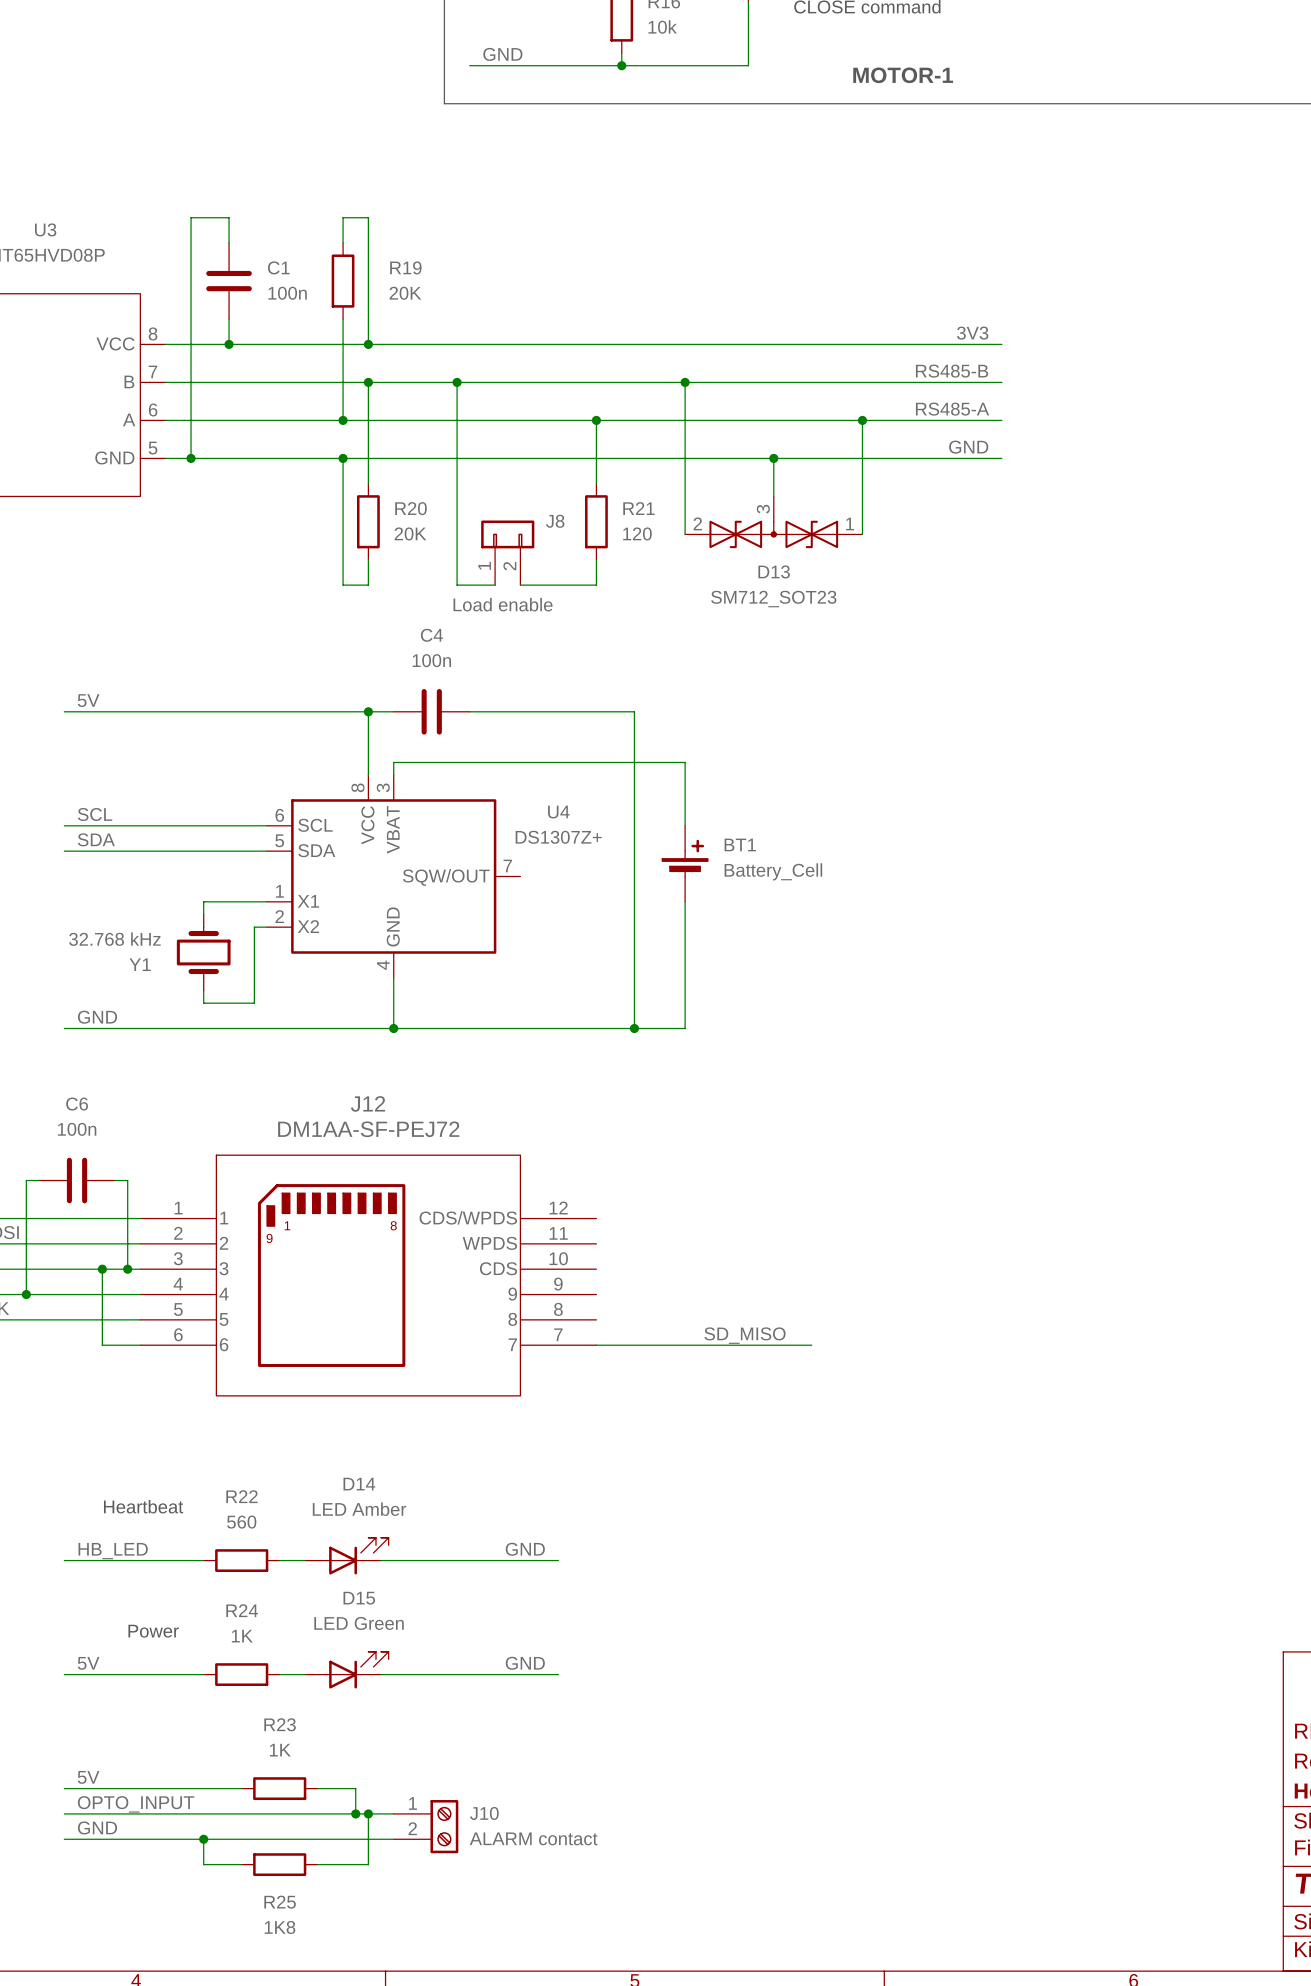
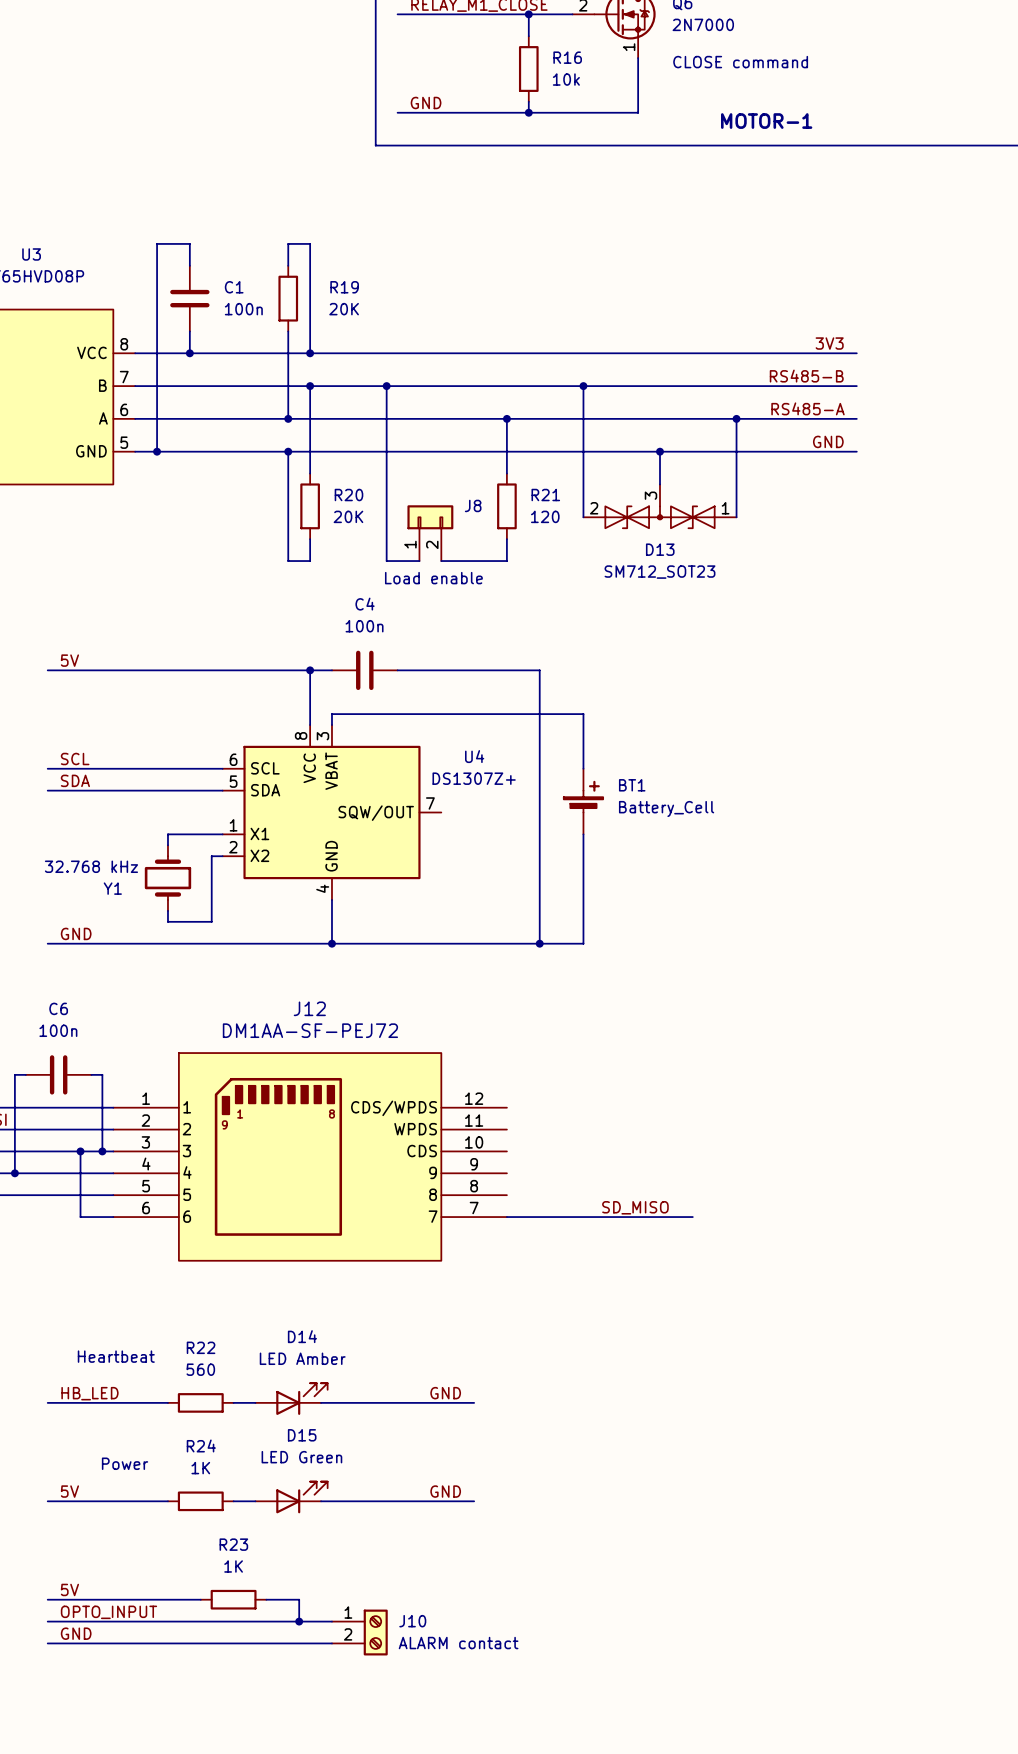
wire: (368, 1813) (368, 1864) (317, 1864) -> none
junction: (368, 1813) -> none
wire: (203, 1839) (203, 1864) (241, 1864) -> none
junction: (203, 1839) -> none
R25: 1K8 (279, 1864) -> none

